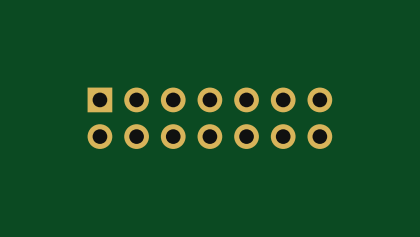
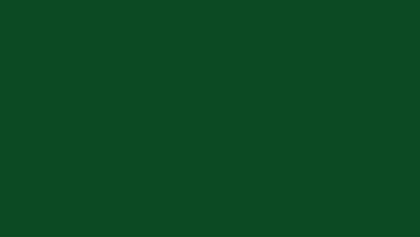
part: (209, 118) -> none

